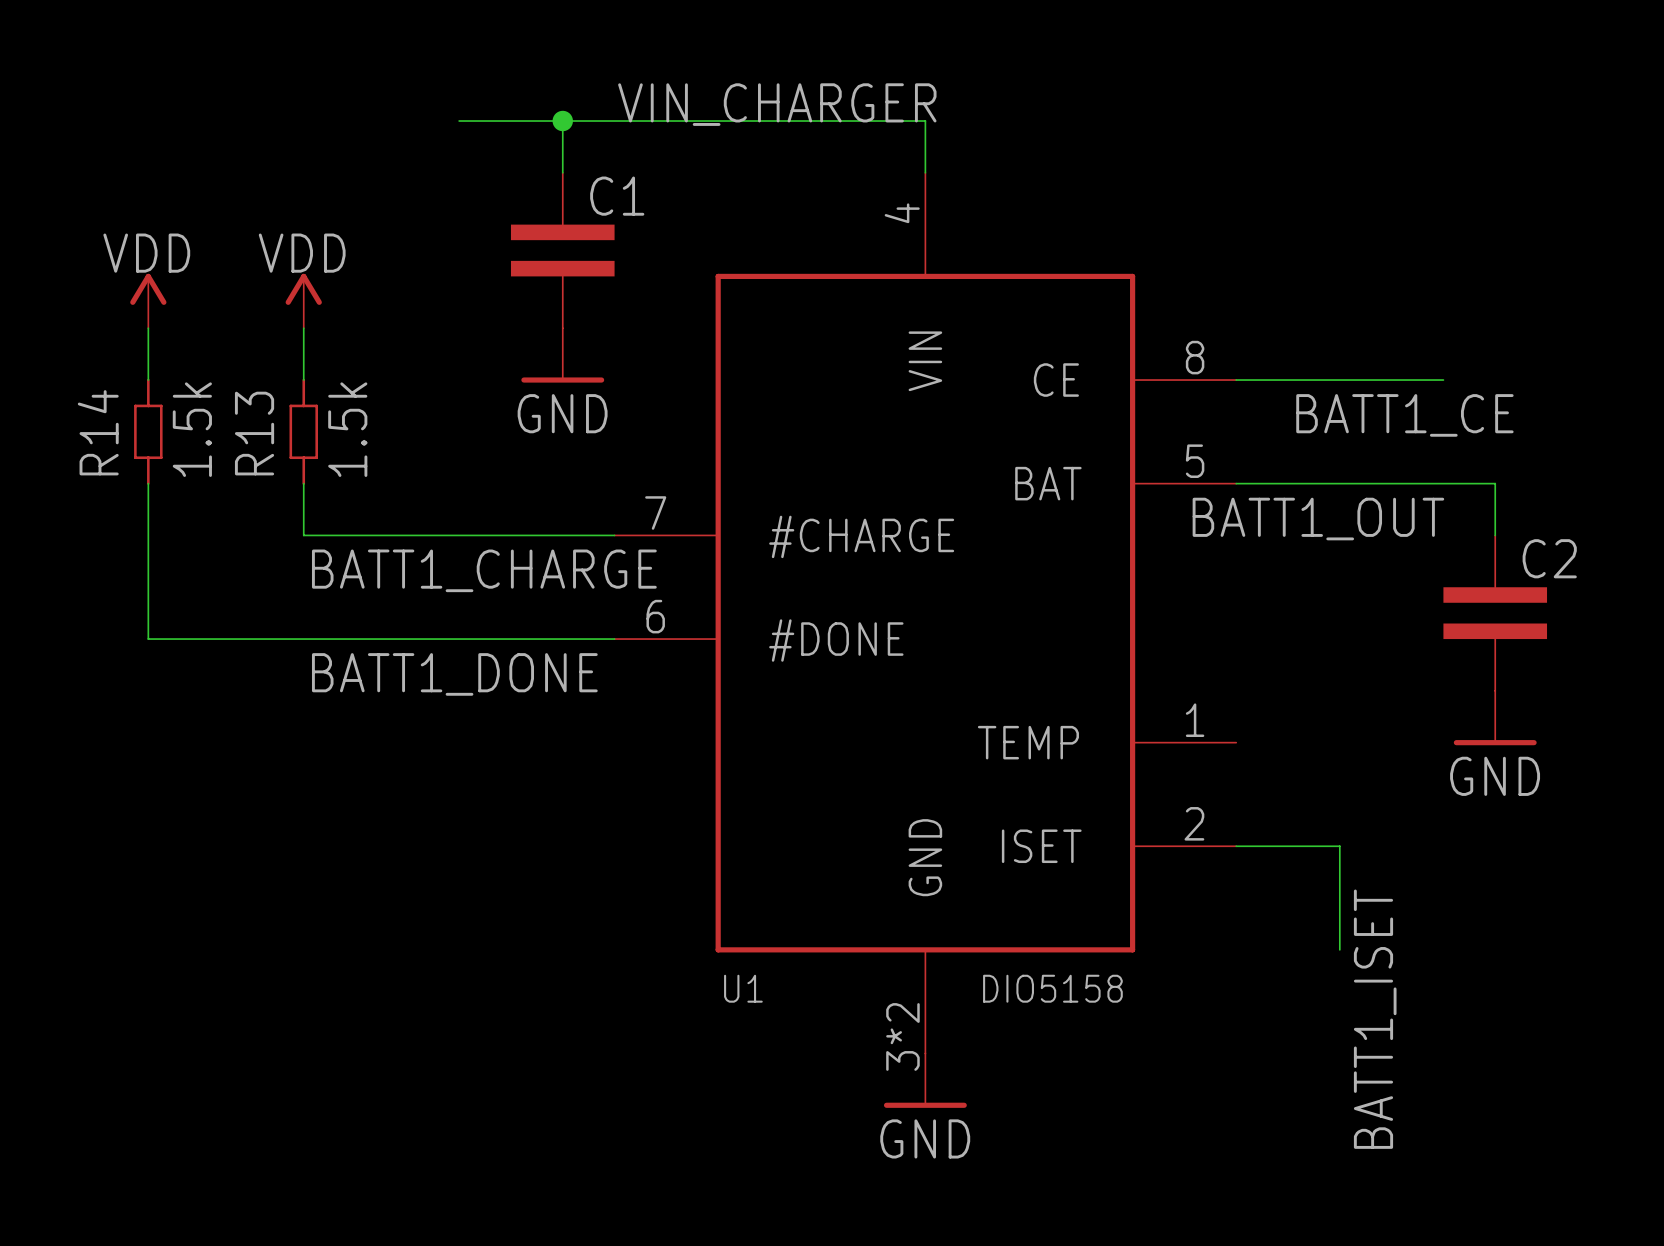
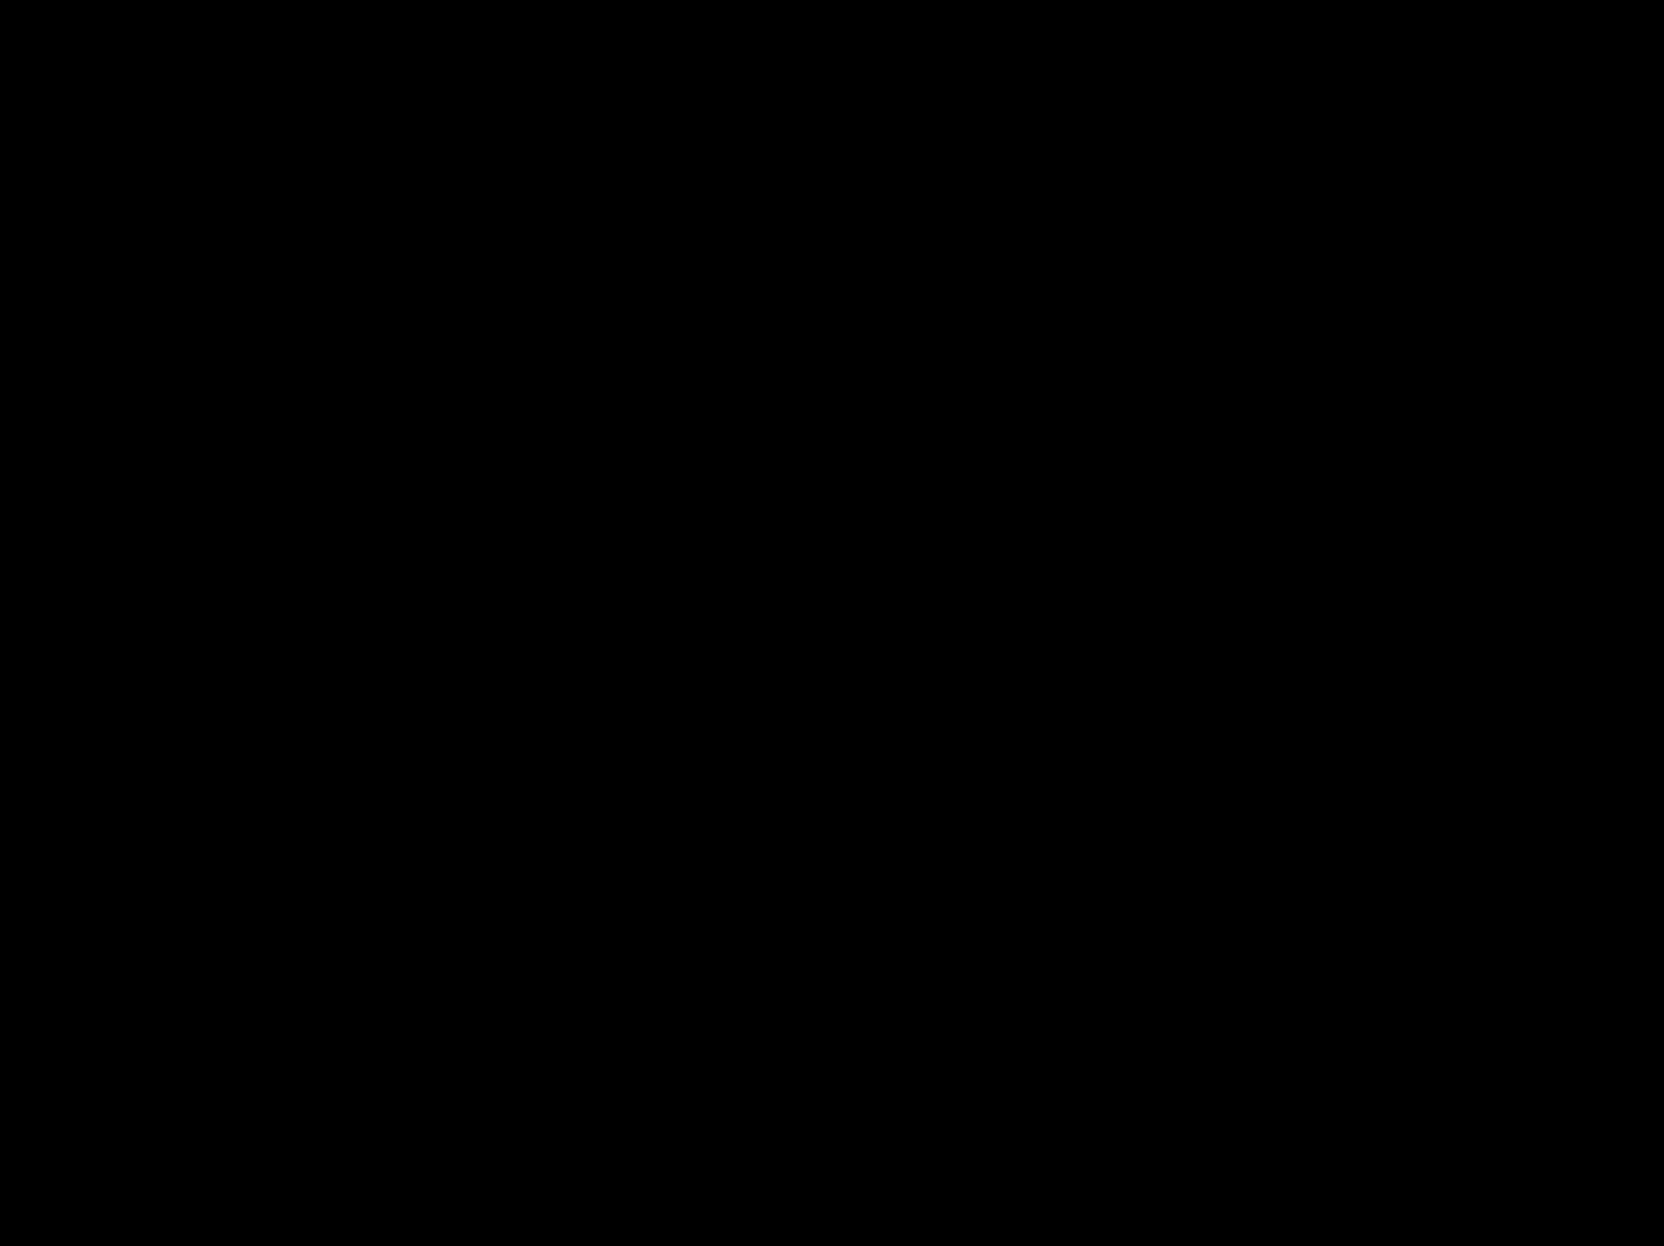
label: VIN_CHARGER (777, 104) -> none
wire: (459, 121) (925, 121) (925, 172) -> none
wire: (562, 121) (562, 172) -> none
junction: (562, 121) -> none
C1: (562, 250) -> none
power symbol: VDD (148, 301) -> none
power symbol: VDD (303, 301) -> none
wire: (148, 328) (148, 380) -> none
wire: (303, 328) (303, 380) -> none
power symbol: GND (562, 355) -> none
wire: (1236, 380) (1443, 380) -> none
label: BATT1_CE (1404, 415) -> none
R14: 1.5k (148, 431) -> none
R13: 1.5k (303, 431) -> none
wire: (148, 483) (148, 639) (614, 639) -> none
wire: (303, 483) (303, 535) (614, 535) -> none
wire: (1236, 483) (1495, 483) (1495, 535) -> none
label: BATT1_OUT (1318, 519) -> none
label: BATT1_CHARGE (484, 570) -> none
U1: (925, 613) -> none
C2: (1495, 613) -> none
label: BATT1_DONE (454, 674) -> none
power symbol: GND (1495, 718) -> none
wire: (1236, 846) (1339, 846) (1339, 949) -> none
label: BATT1_ISET (1375, 1019) -> none
power symbol: GND (925, 1080) -> none

